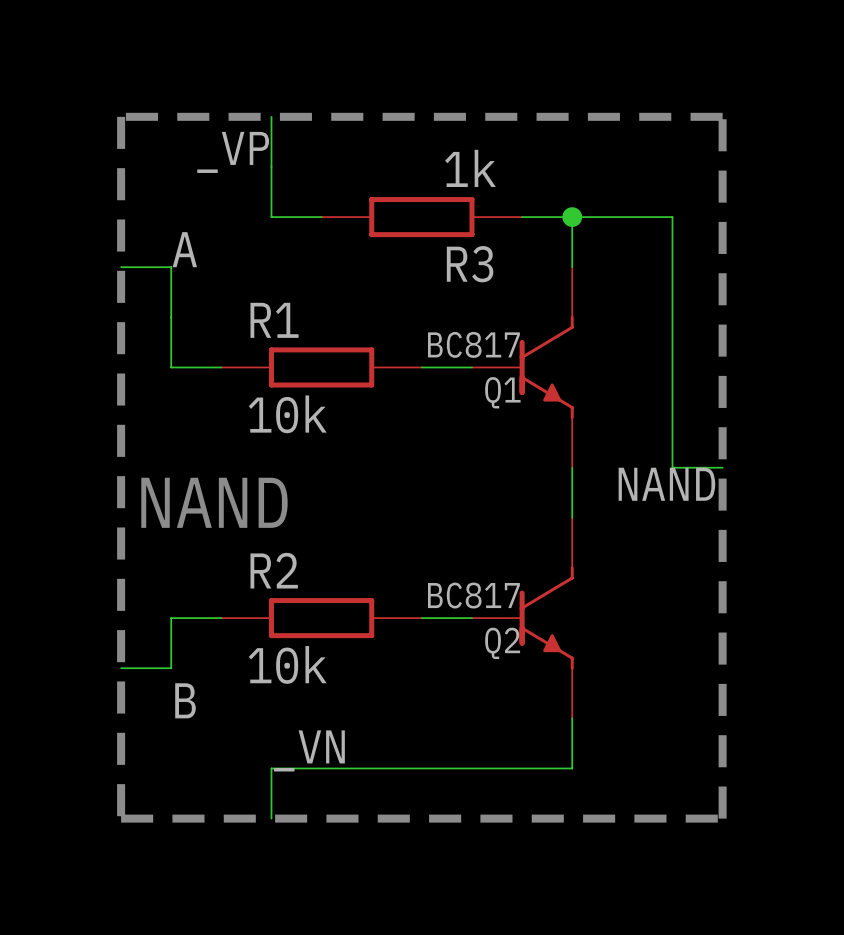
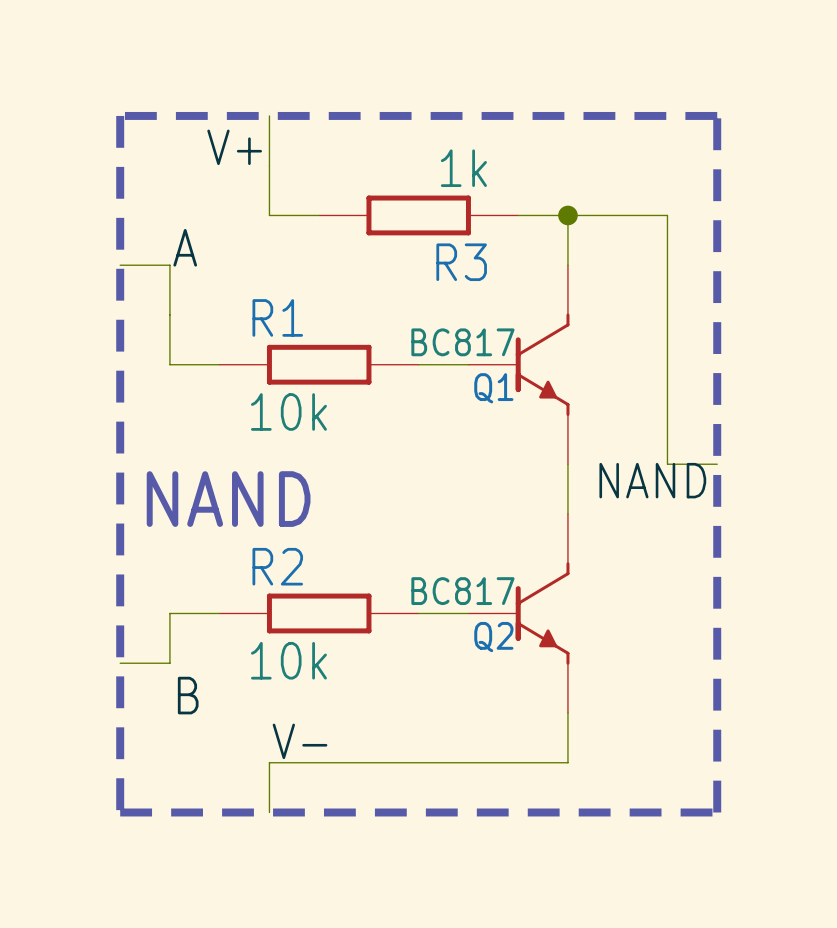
label: _VP (233, 152) -> V+ (234, 147)
label: _VN (309, 750) -> V- (300, 741)

